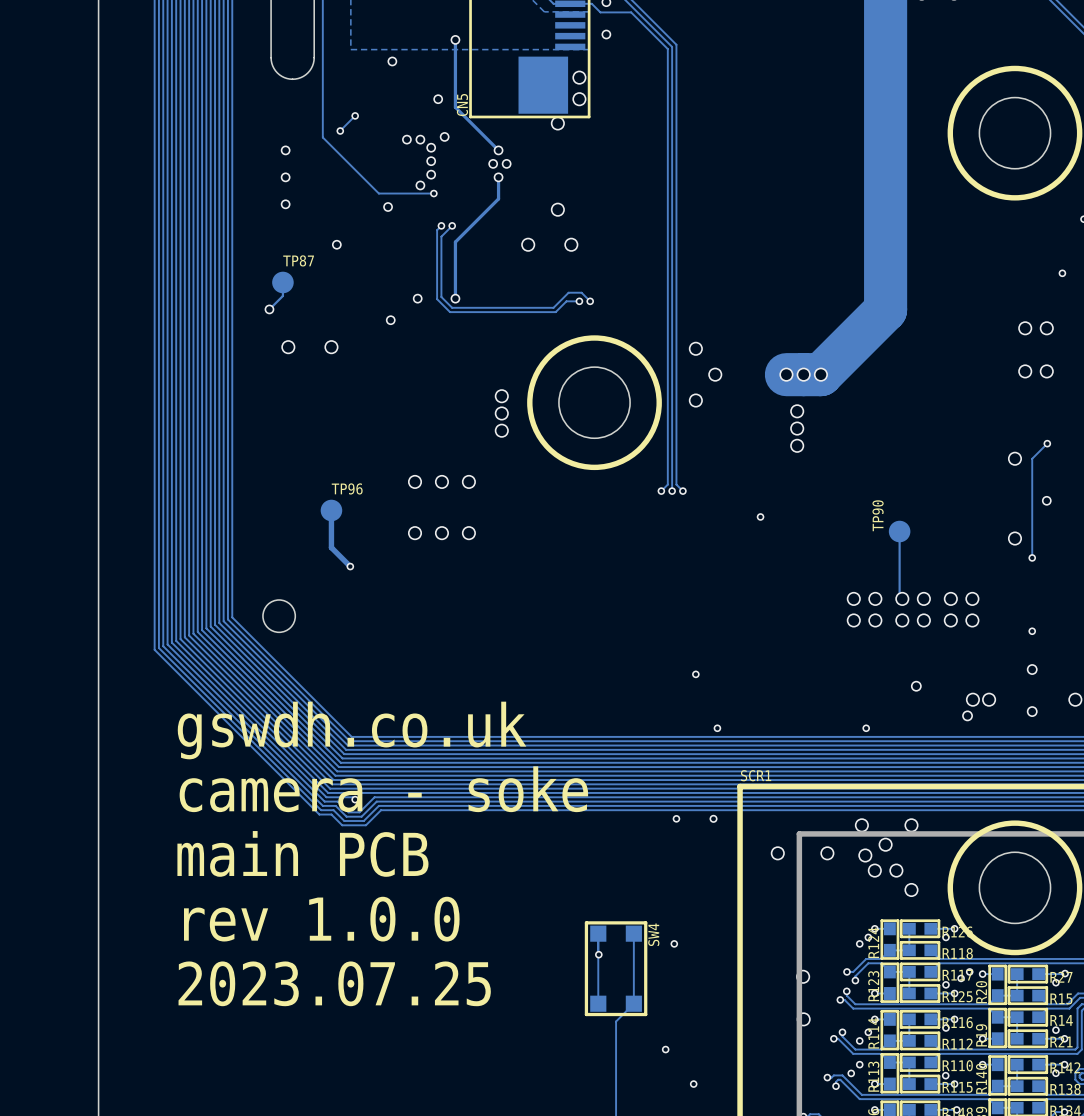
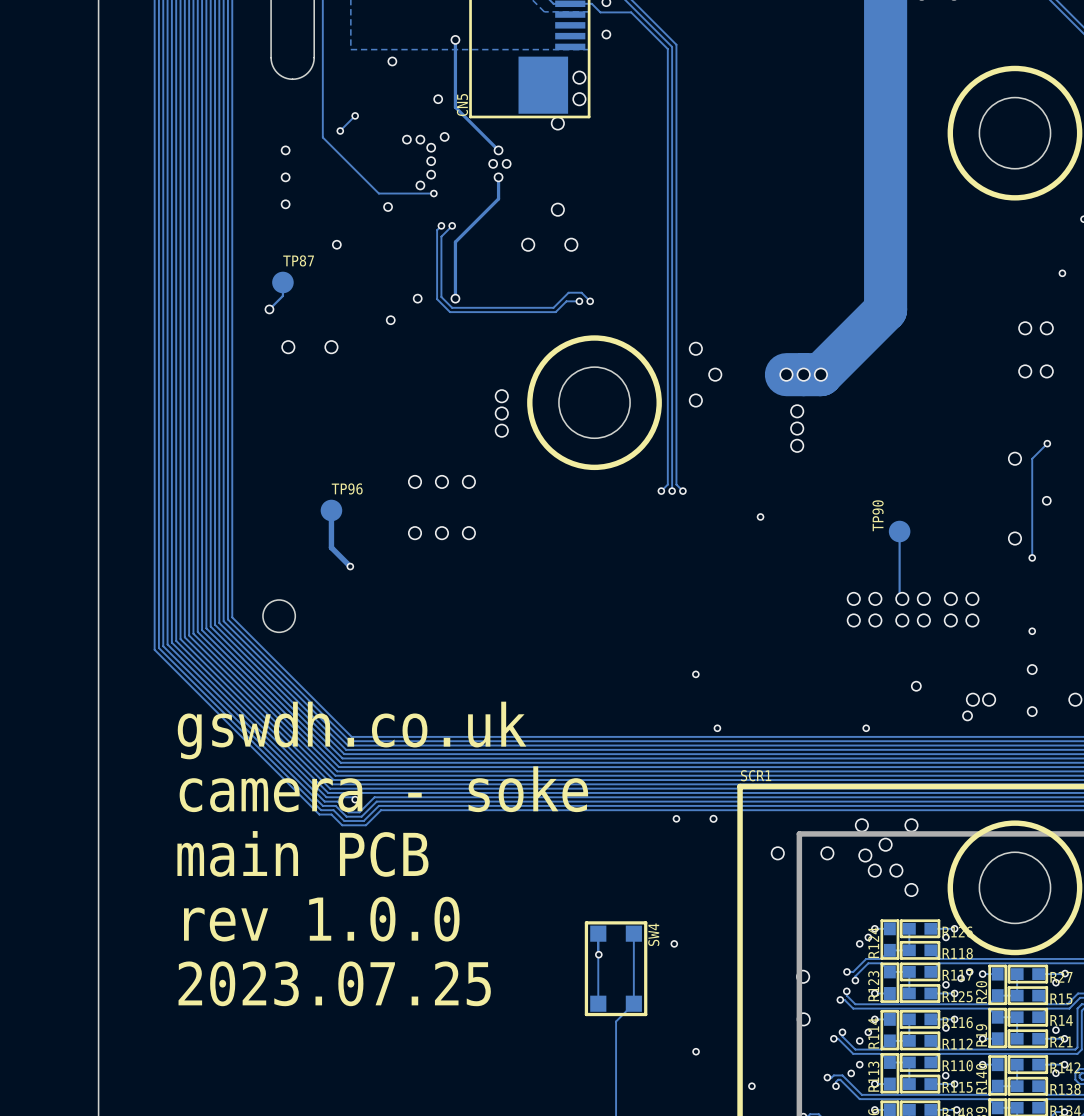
via: (665, 1049) -> none
via: none -> (696, 1051)
via: (693, 1084) -> none
via: none -> (751, 1086)

